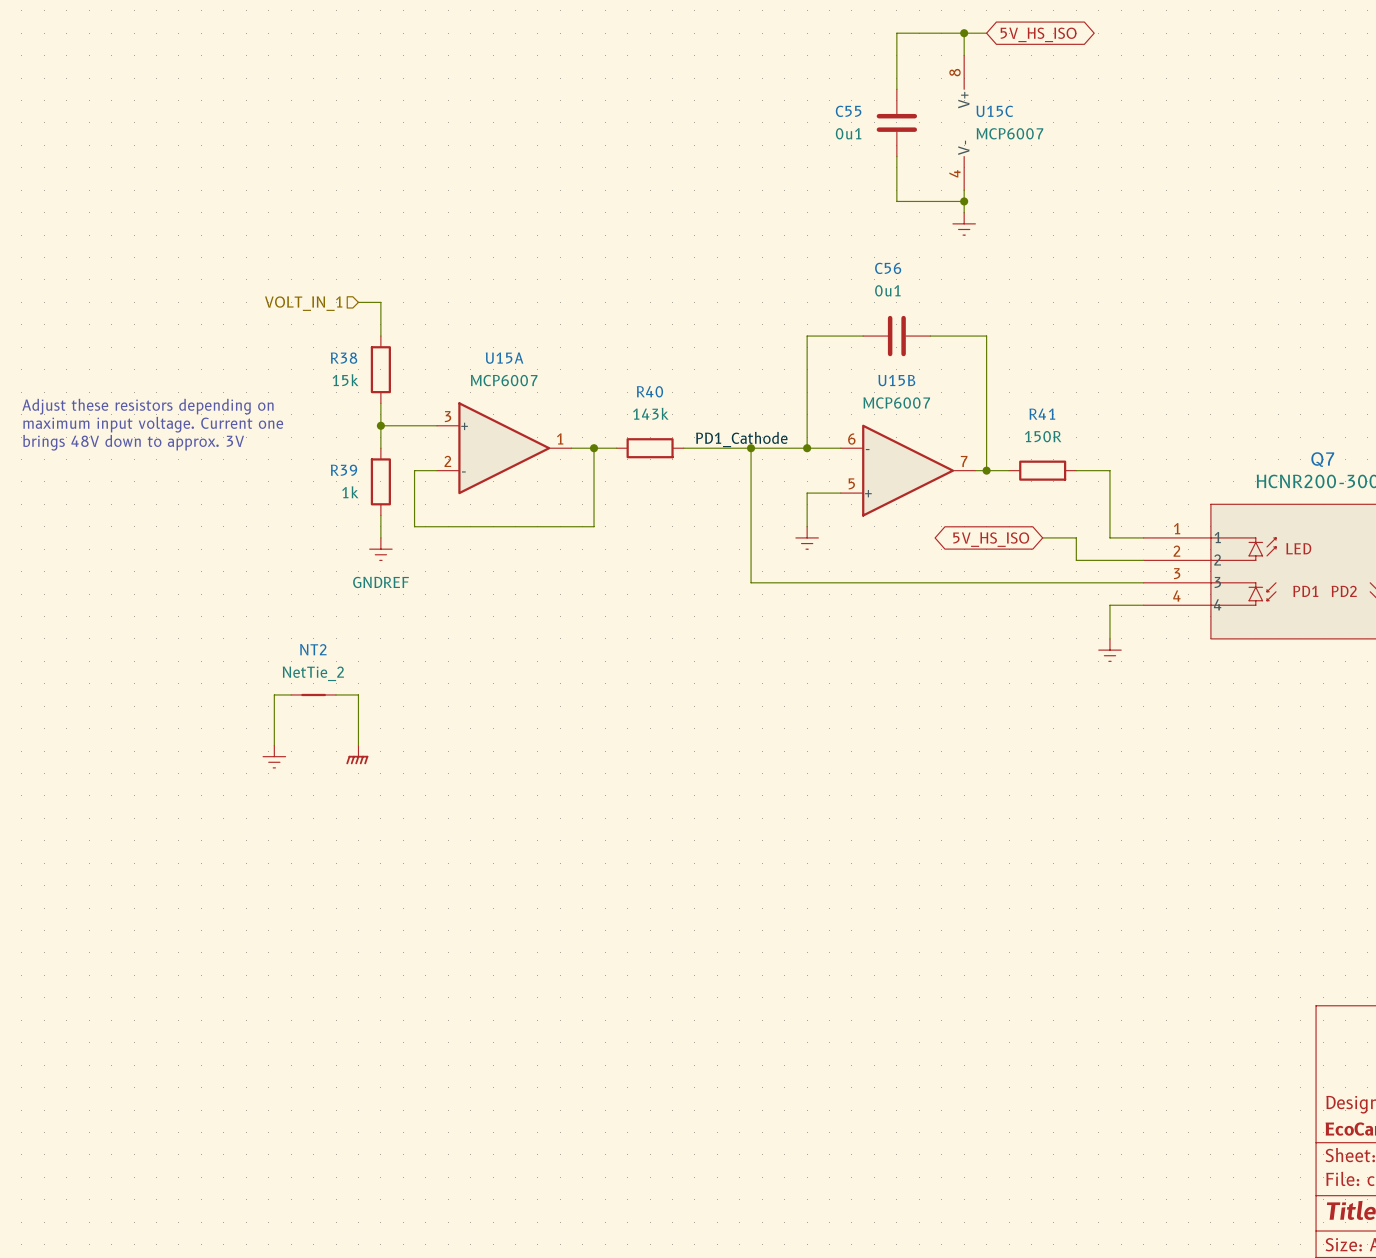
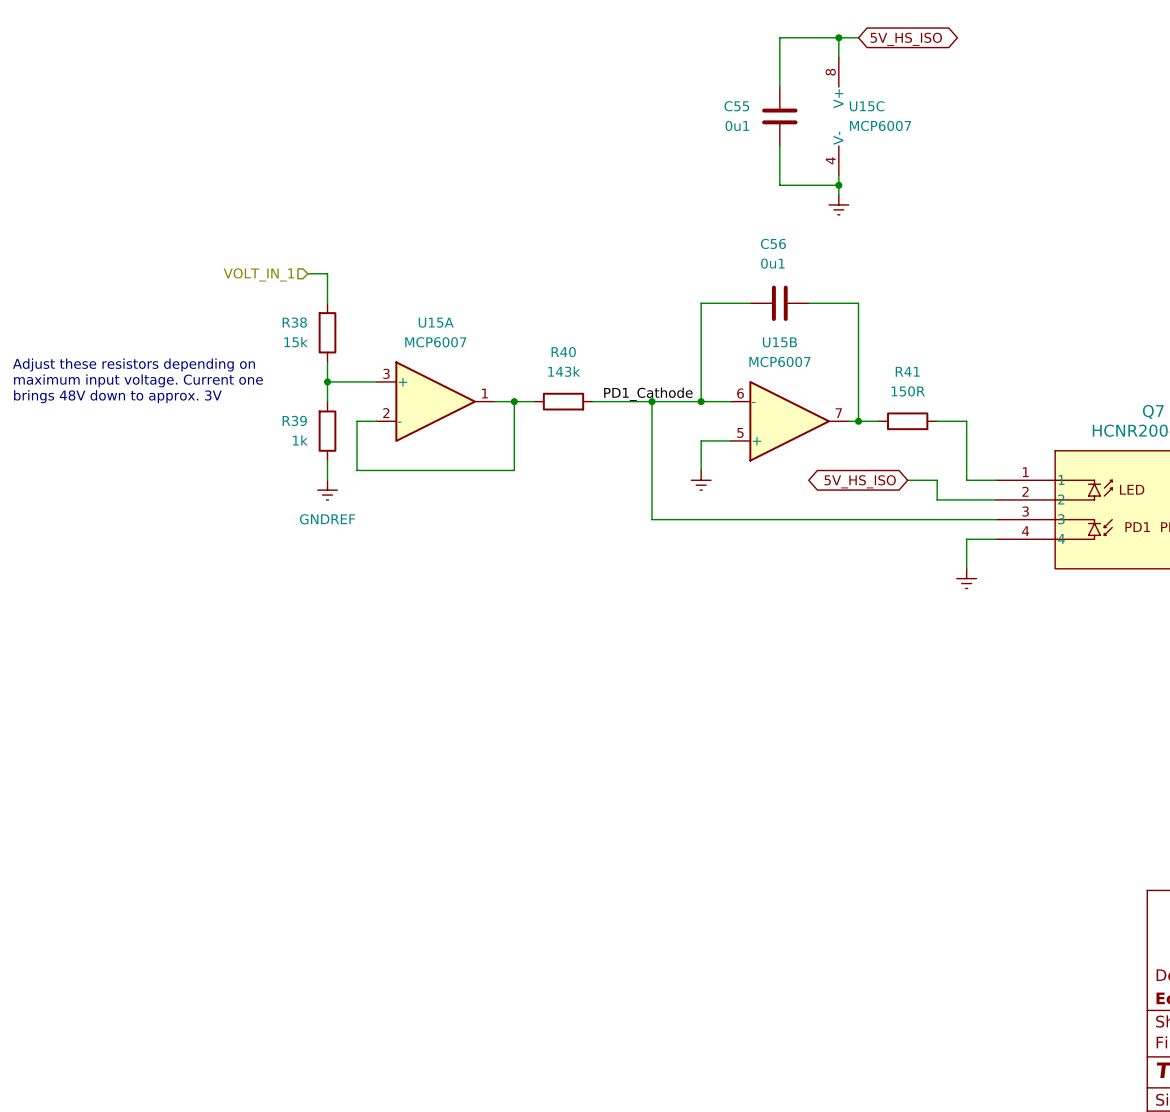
wire: (291, 694) (274, 694) (274, 745) -> none
NT2: NetTie_2 (313, 694) -> none
wire: (336, 694) (358, 694) (358, 745) -> none
power symbol: (357, 754) -> none
power symbol: (274, 756) -> none

